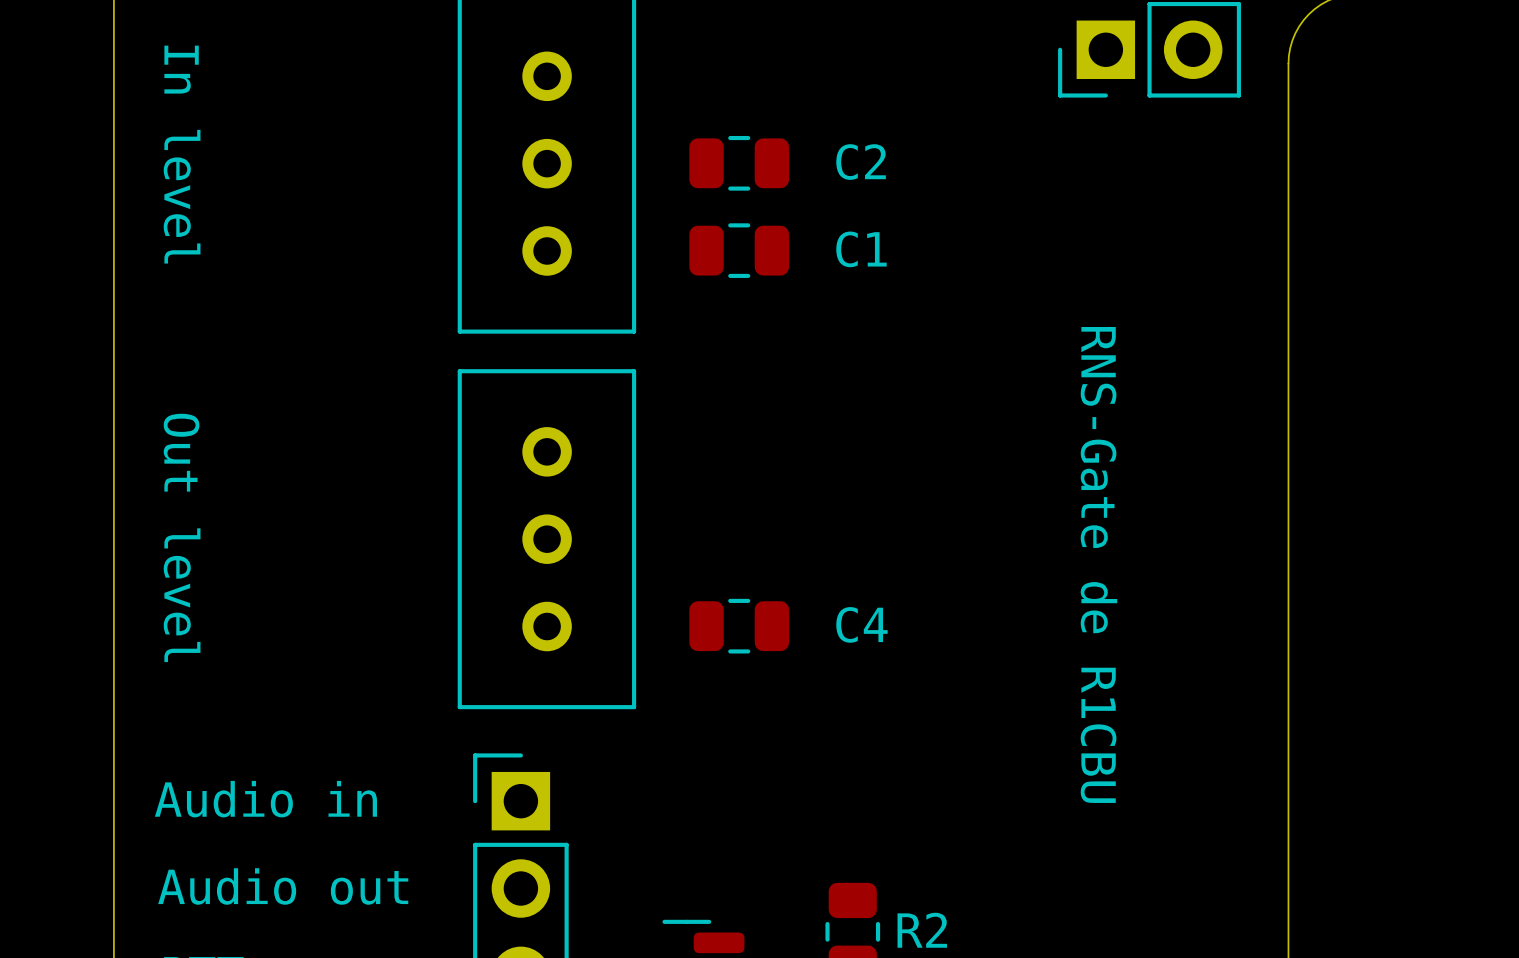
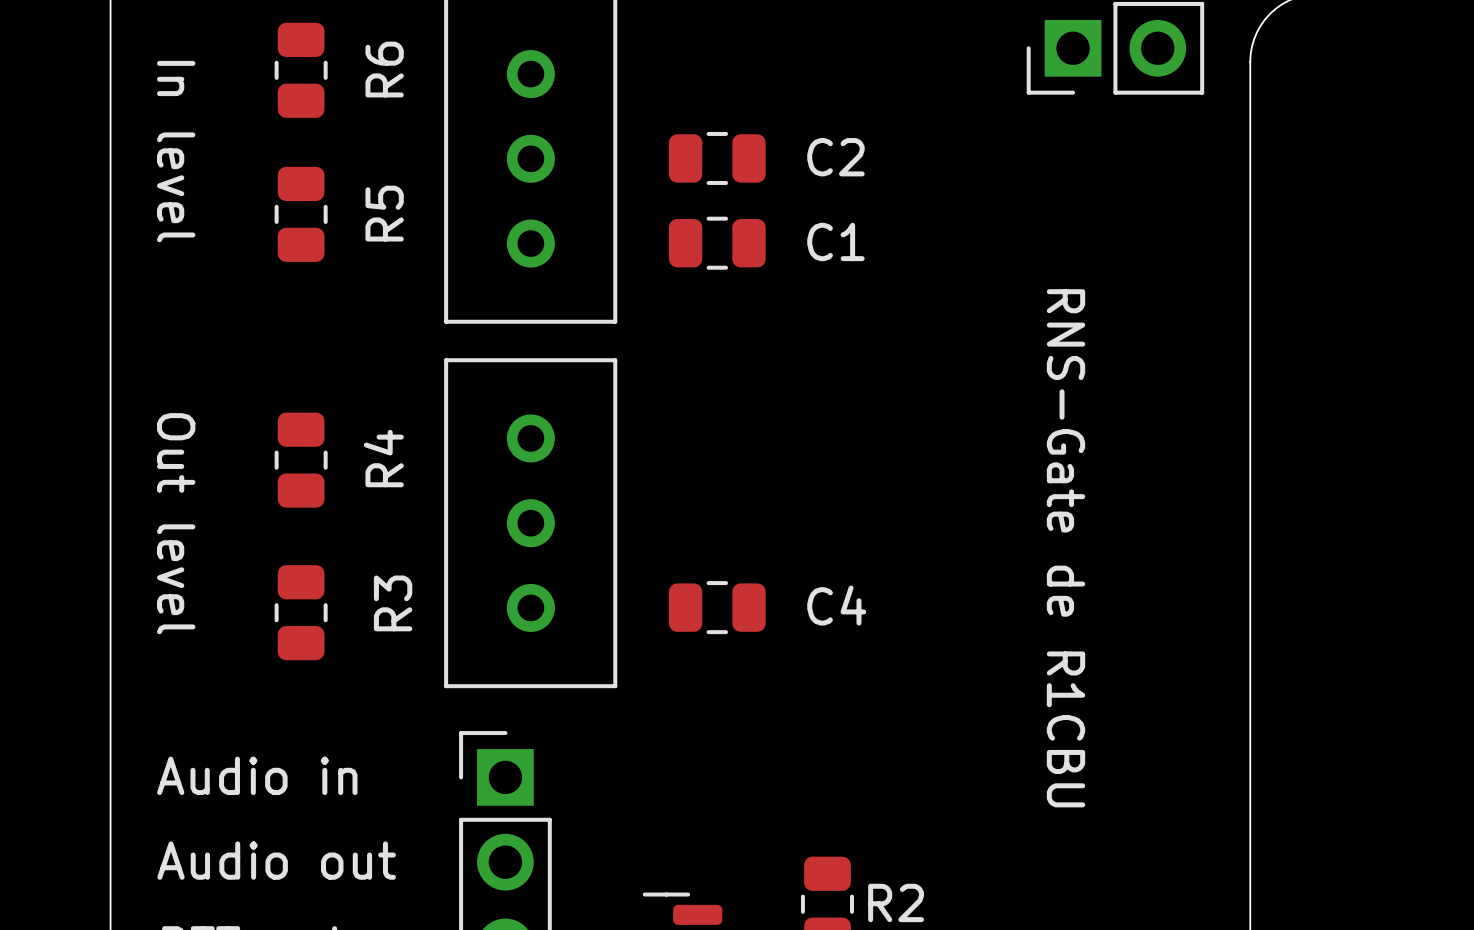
R6: none -> (301, 70)
R5: none -> (301, 214)
R4: none -> (301, 460)
R3: none -> (301, 612)

